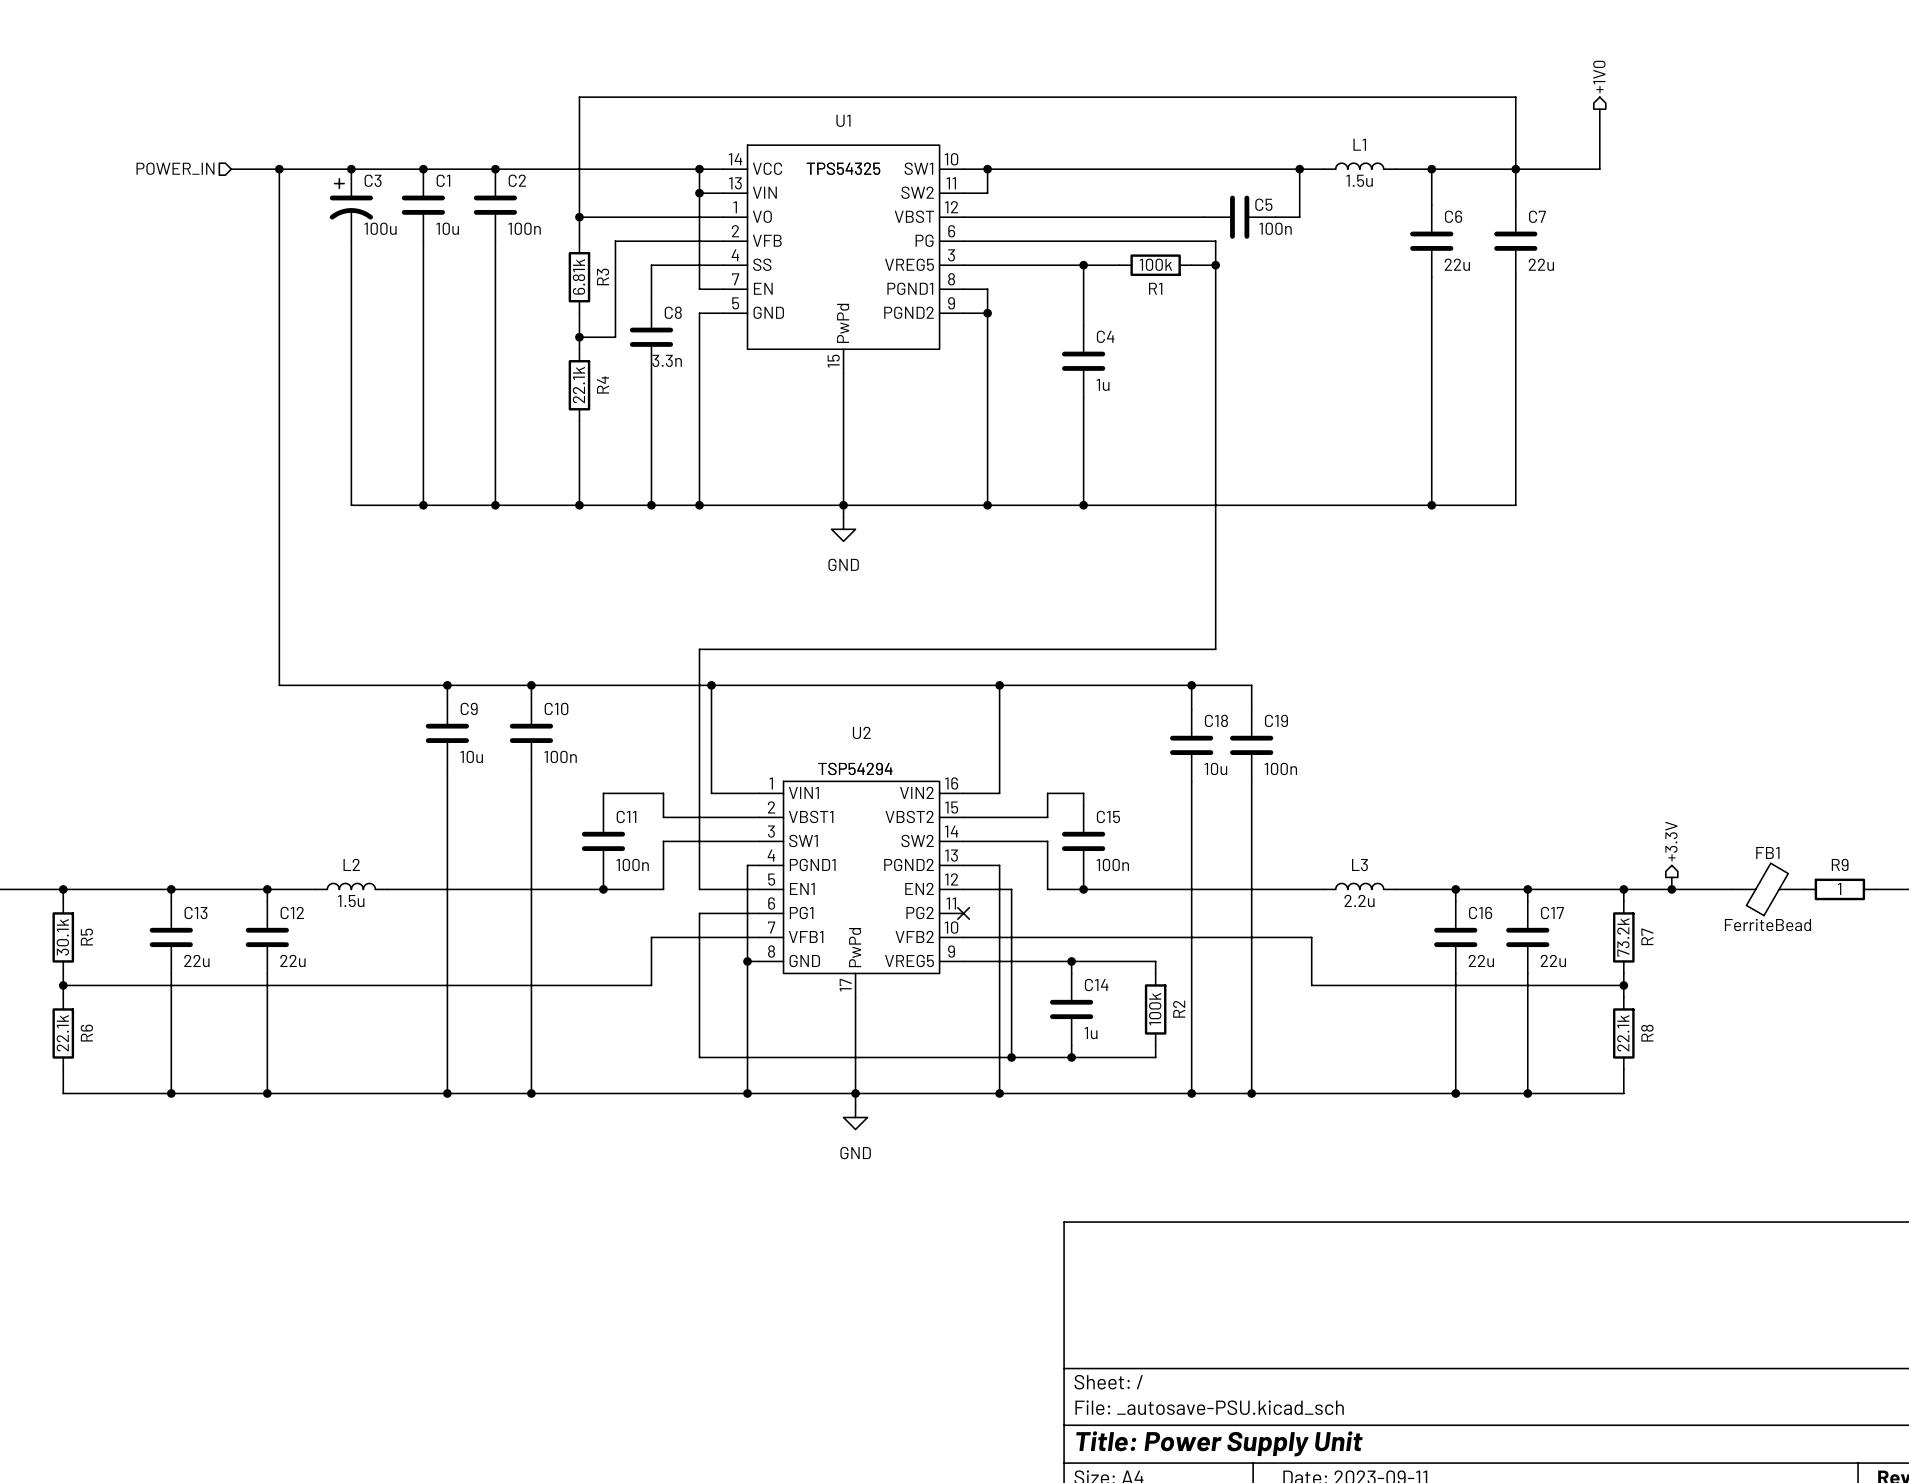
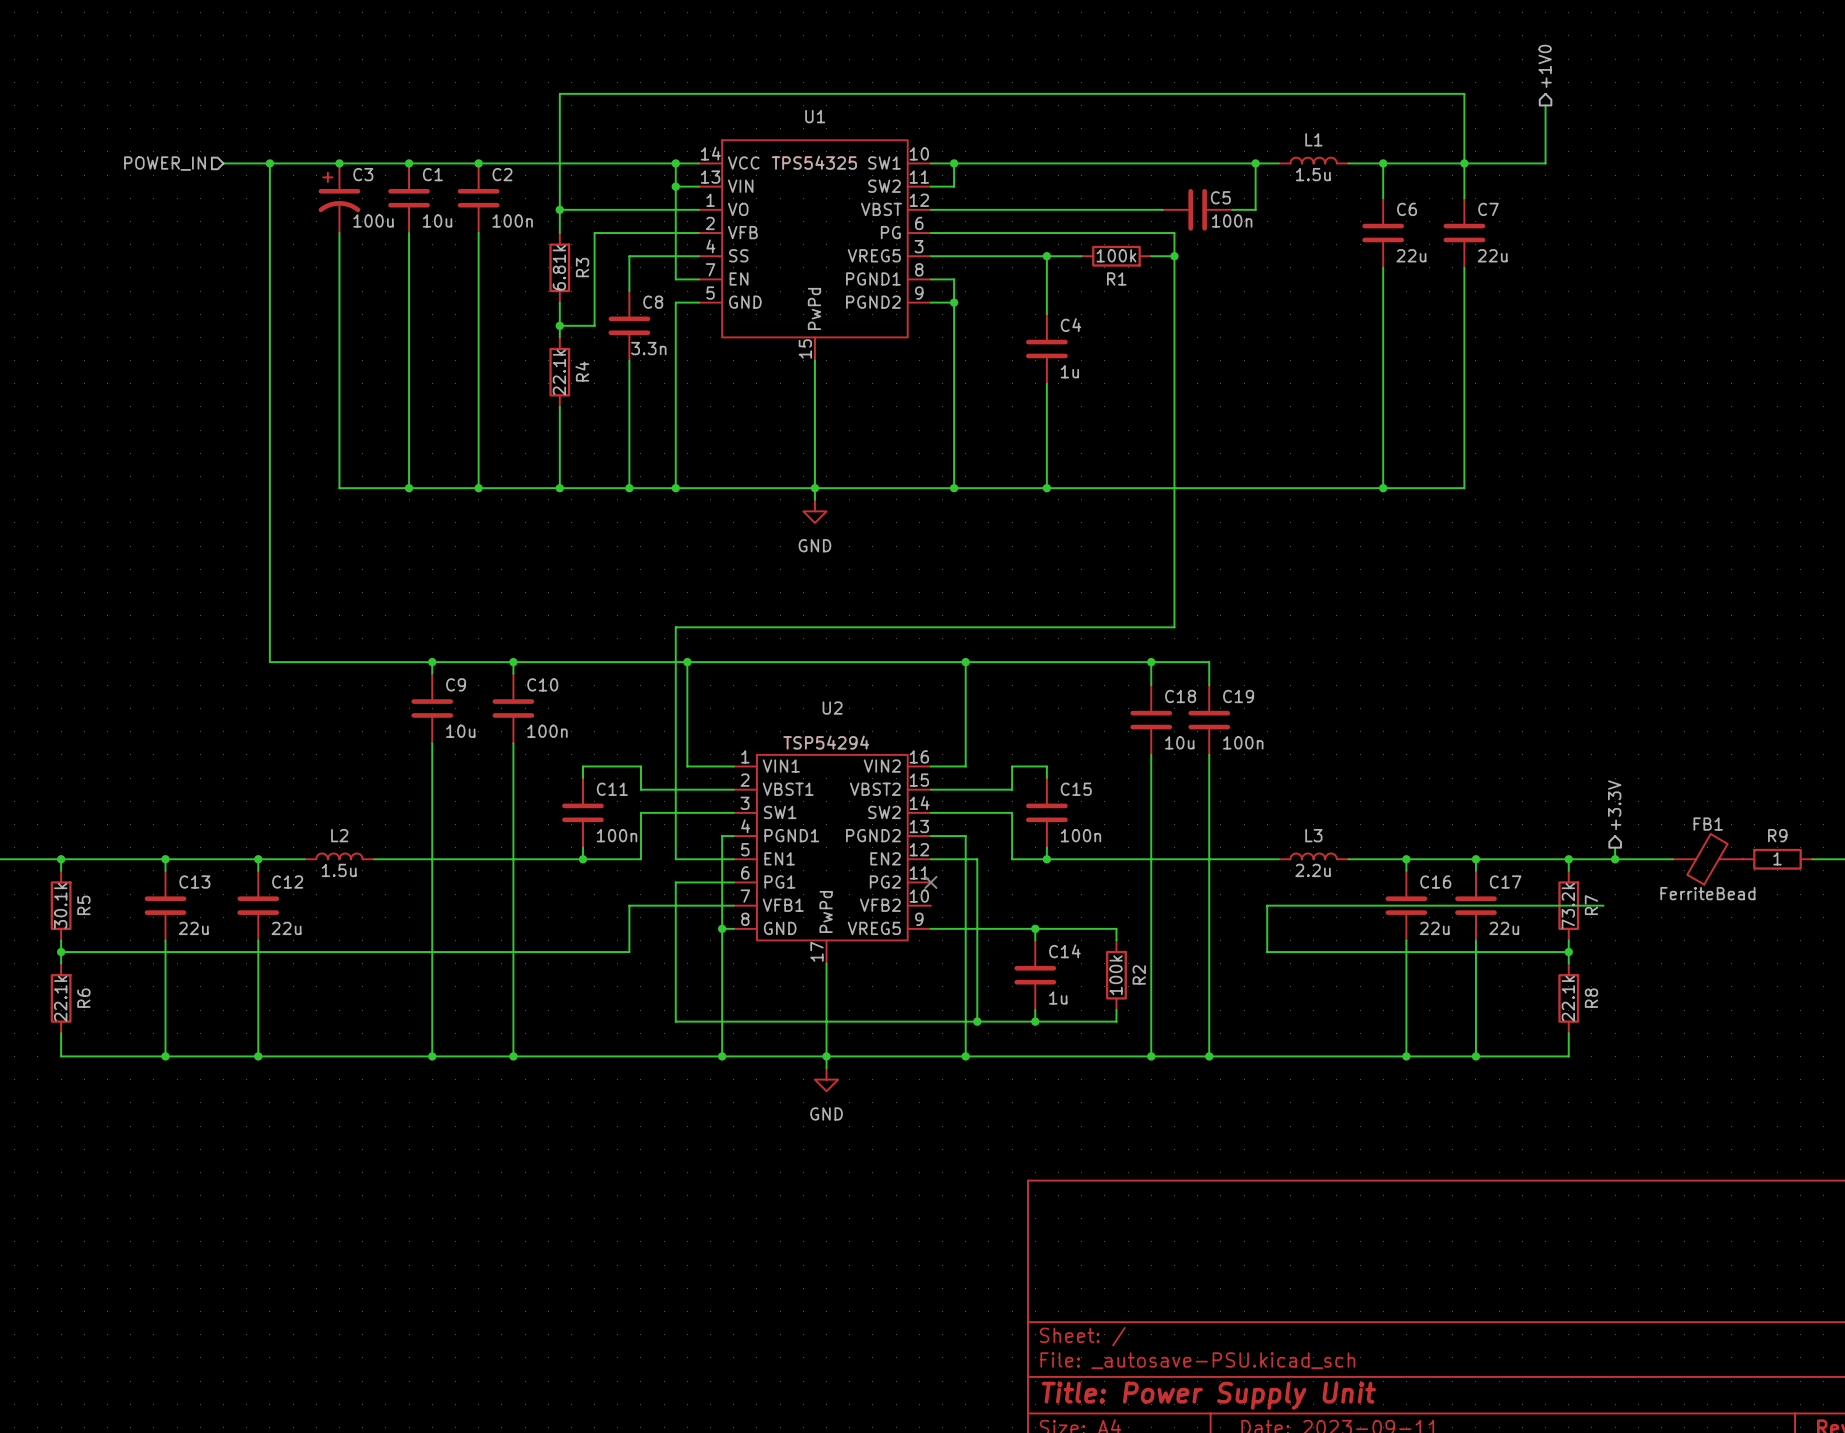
wire: (963, 937) (1311, 937) -> (1603, 905) (1267, 905)

